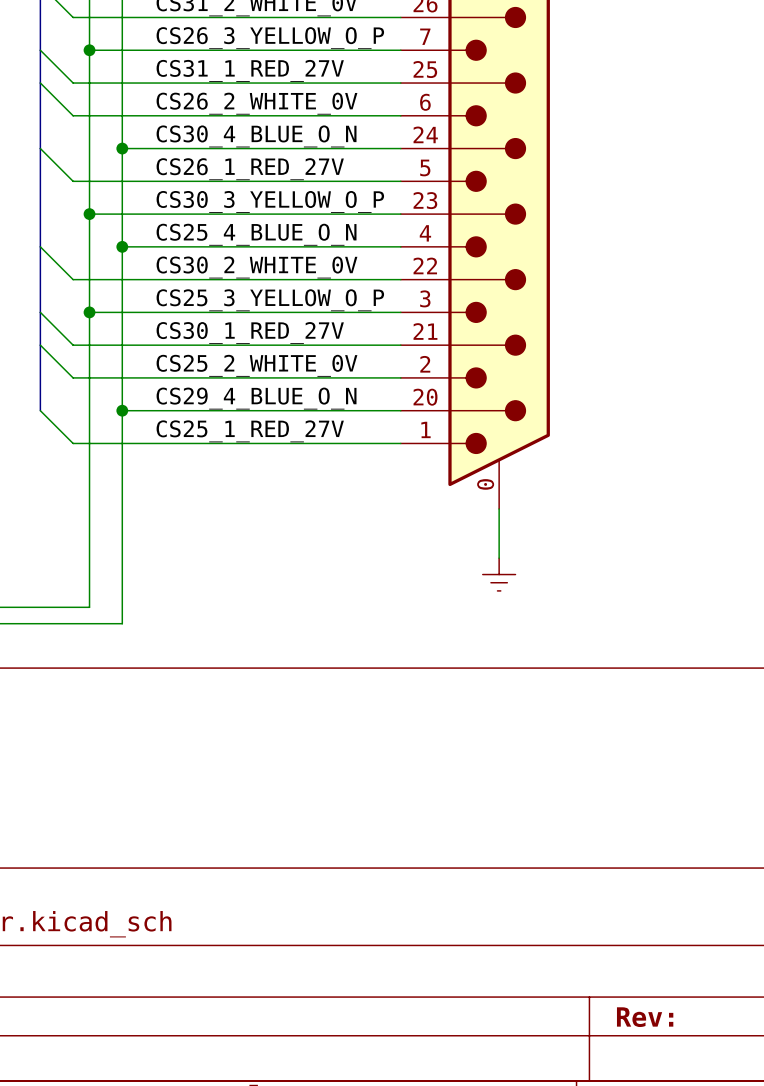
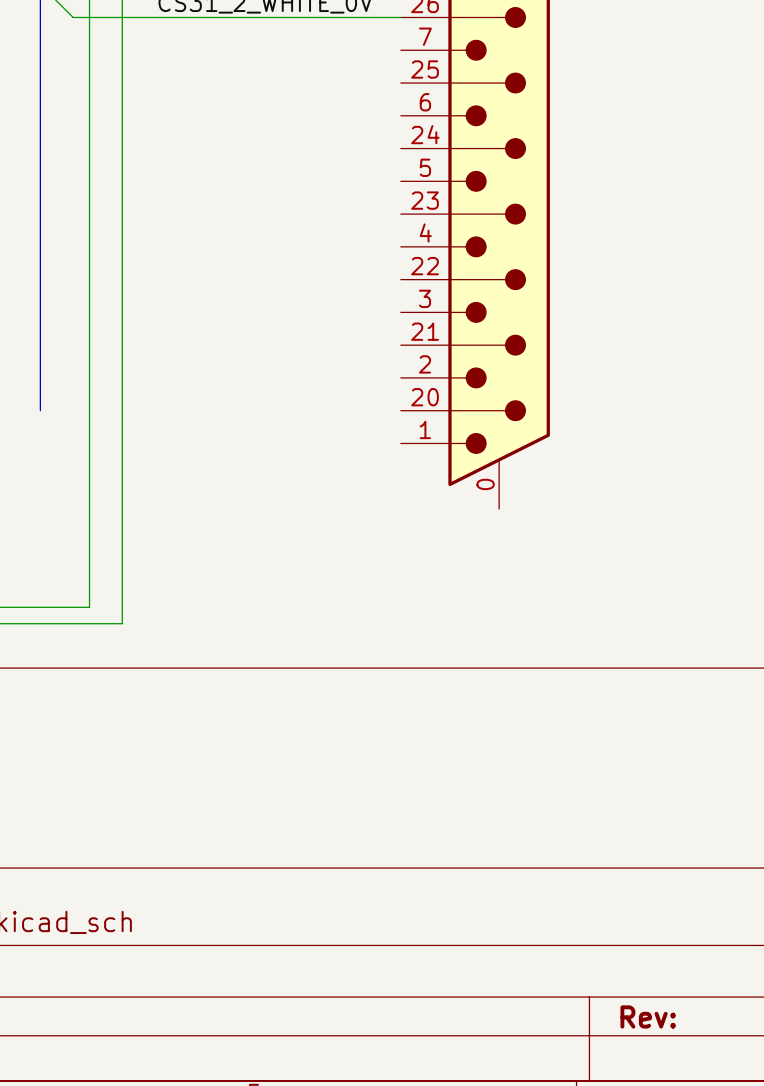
label: CS26_3_YELLOW_O_P (270, 38) -> none
wire: (40, 50) (73, 83) (400, 83) -> none
wire: (89, 50) (400, 50) -> none
junction: (89, 50) -> none
label: CS31_1_RED_27V (250, 70) -> none
wire: (40, 83) (73, 115) (400, 115) -> none
label: CS26_2_WHITE_0V (256, 103) -> none
label: CS30_4_BLUE_O_N (256, 136) -> none
wire: (40, 148) (73, 181) (400, 181) -> none
wire: (122, 148) (400, 148) -> none
junction: (122, 148) -> none
label: CS26_1_RED_27V (250, 169) -> none
label: CS30_3_YELLOW_O_P (270, 201) -> none
wire: (89, 214) (400, 214) -> none
junction: (89, 214) -> none
label: CS25_4_BLUE_O_N (256, 234) -> none
wire: (40, 246) (73, 279) (400, 279) -> none
wire: (122, 246) (400, 246) -> none
junction: (122, 246) -> none
label: CS30_2_WHITE_0V (256, 267) -> none
label: CS25_3_YELLOW_O_P (270, 300) -> none
wire: (40, 312) (73, 345) (400, 345) -> none
wire: (89, 312) (400, 312) -> none
junction: (89, 312) -> none
label: CS30_1_RED_27V (250, 333) -> none
wire: (40, 345) (73, 377) (400, 377) -> none
label: CS25_2_WHITE_0V (256, 365) -> none
label: CS29_4_BLUE_O_N (256, 398) -> none
wire: (40, 410) (73, 443) (400, 443) -> none
wire: (122, 410) (400, 410) -> none
junction: (122, 410) -> none
label: CS25_1_RED_27V (250, 431) -> none
wire: (499, 509) (499, 558) -> none
power symbol: (499, 574) -> none

